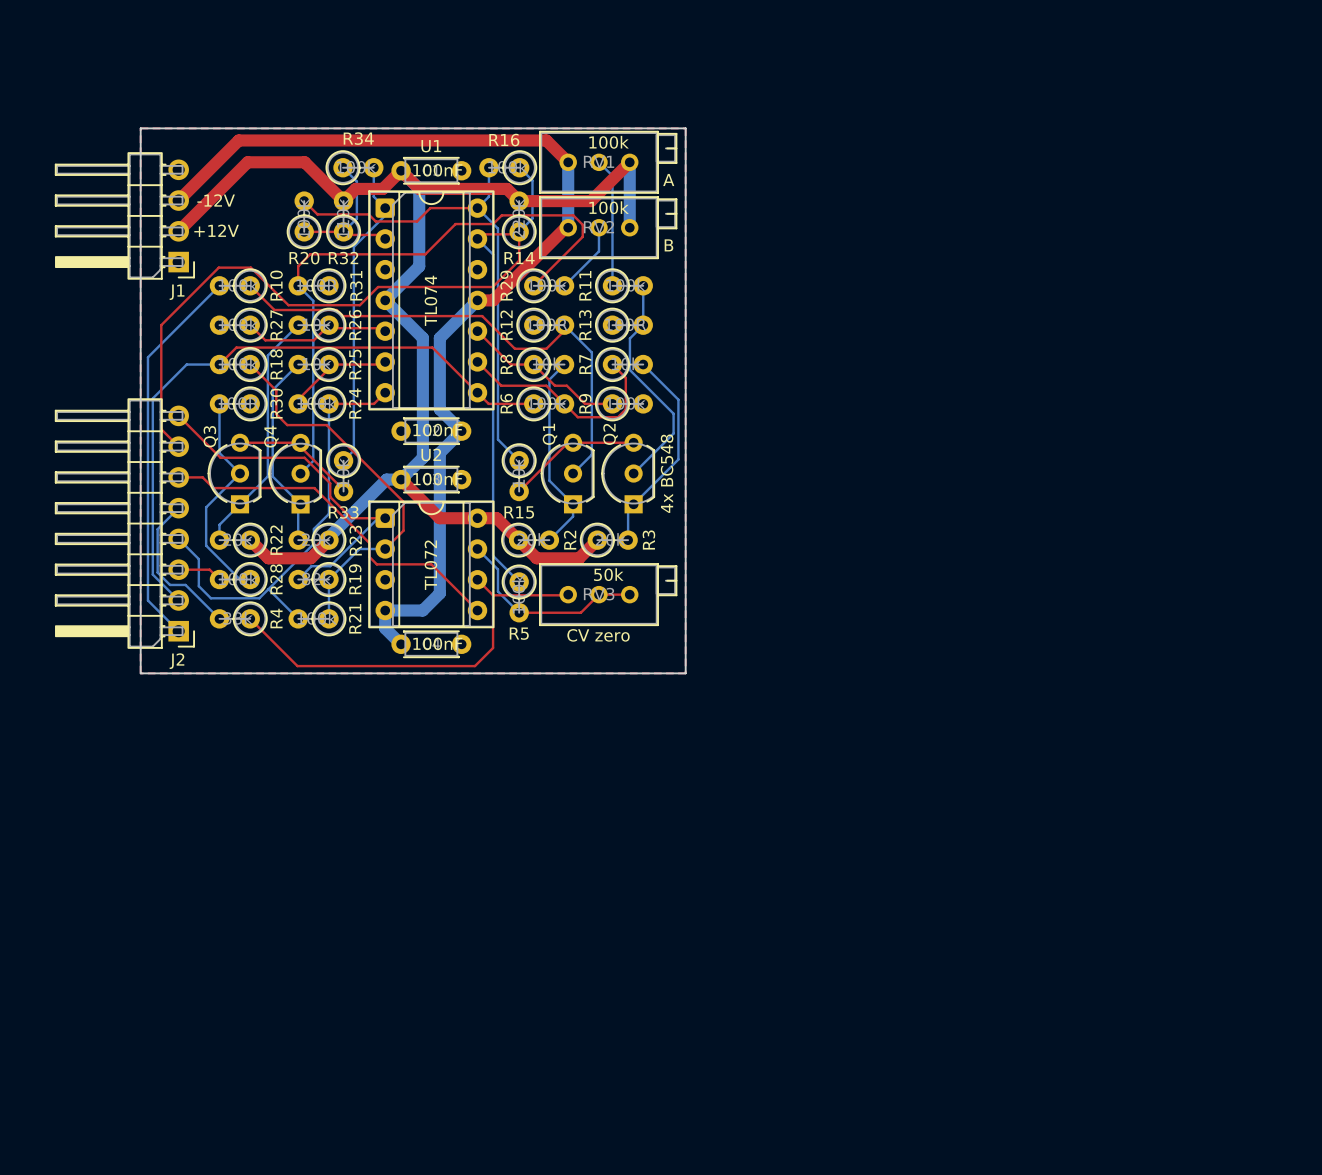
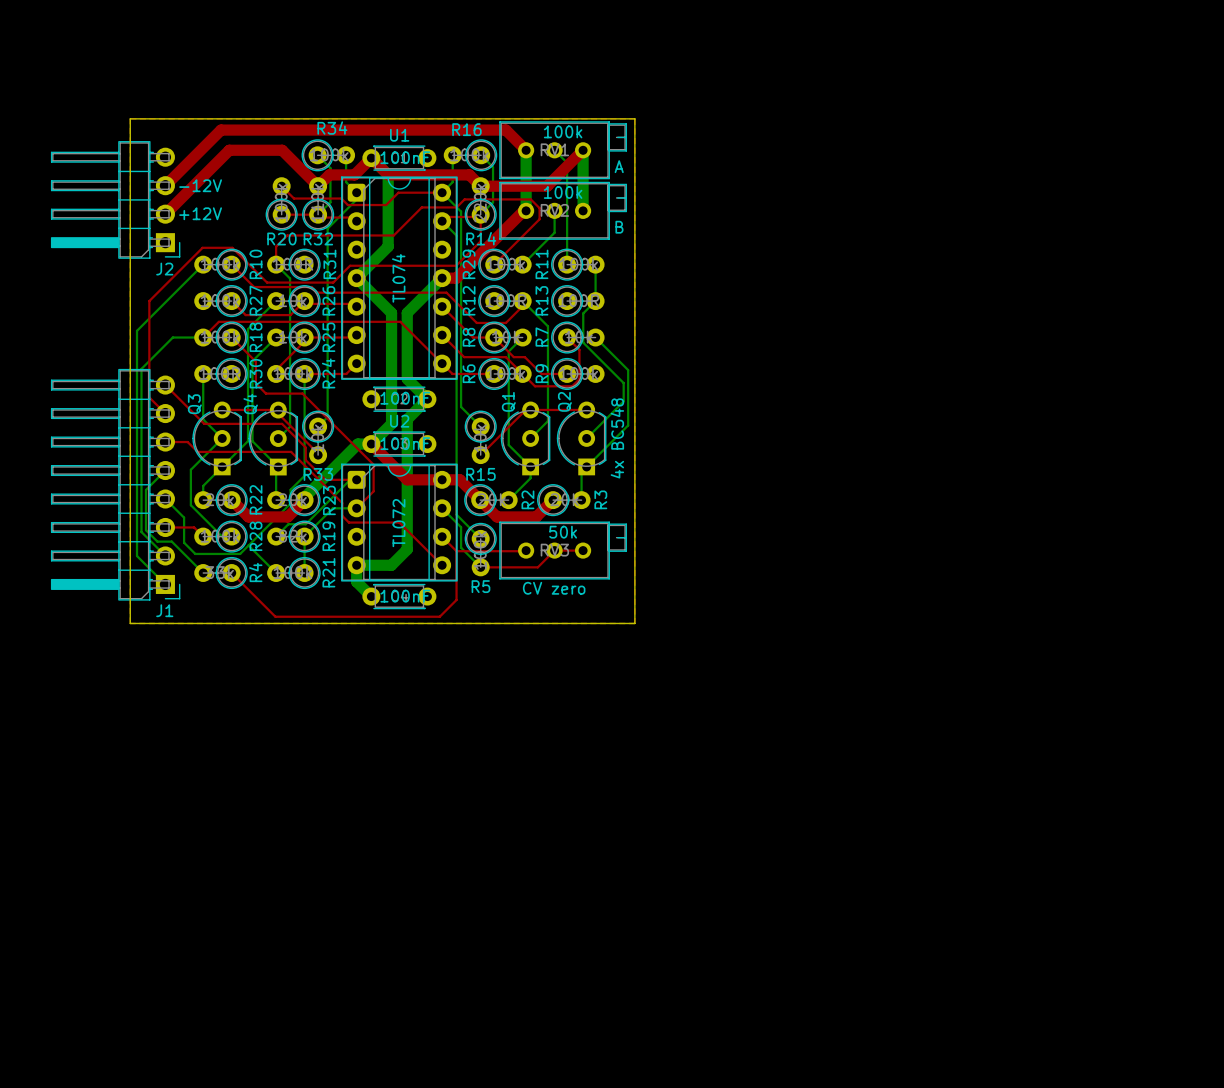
J1 name: J1 (177, 292) -> J2 (164, 269)
J2 name: J2 (176, 661) -> J1 (164, 610)

